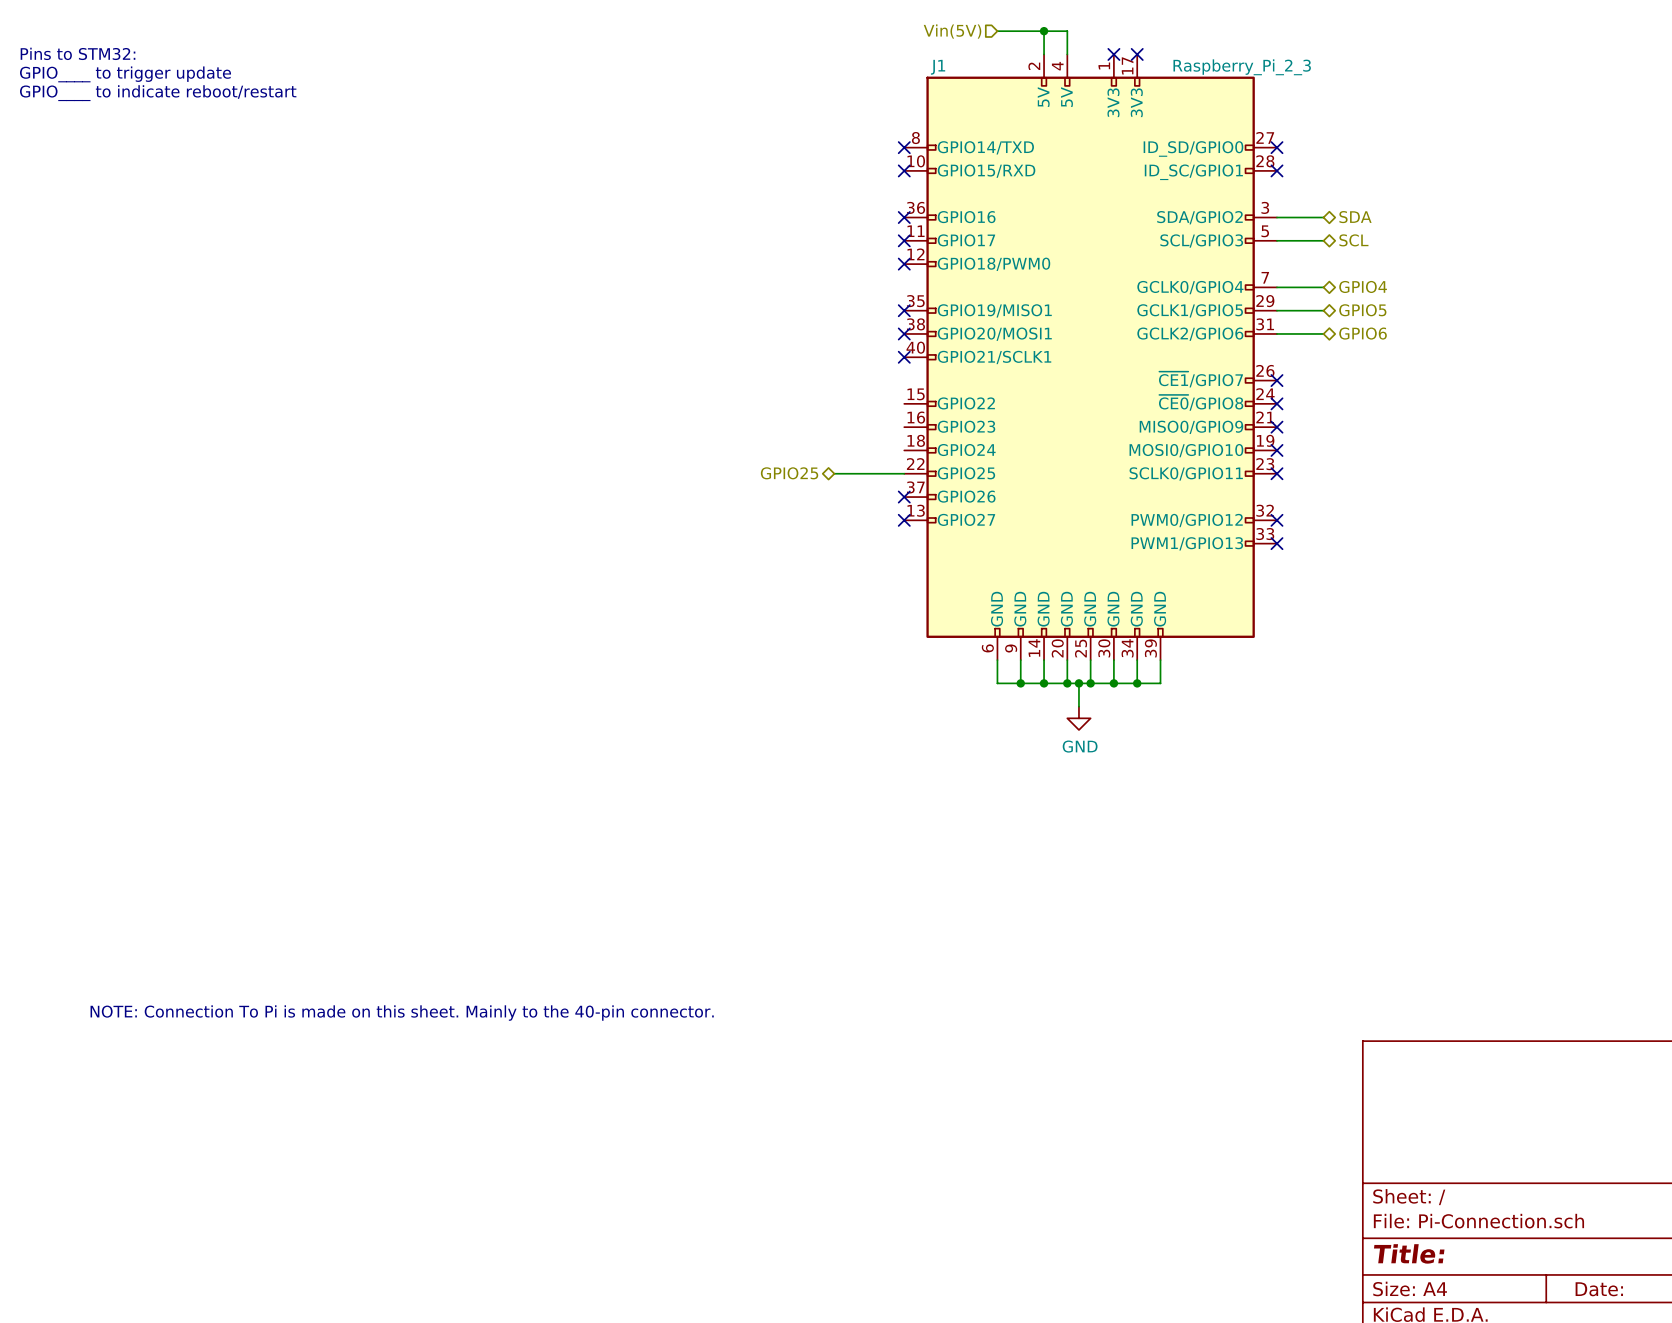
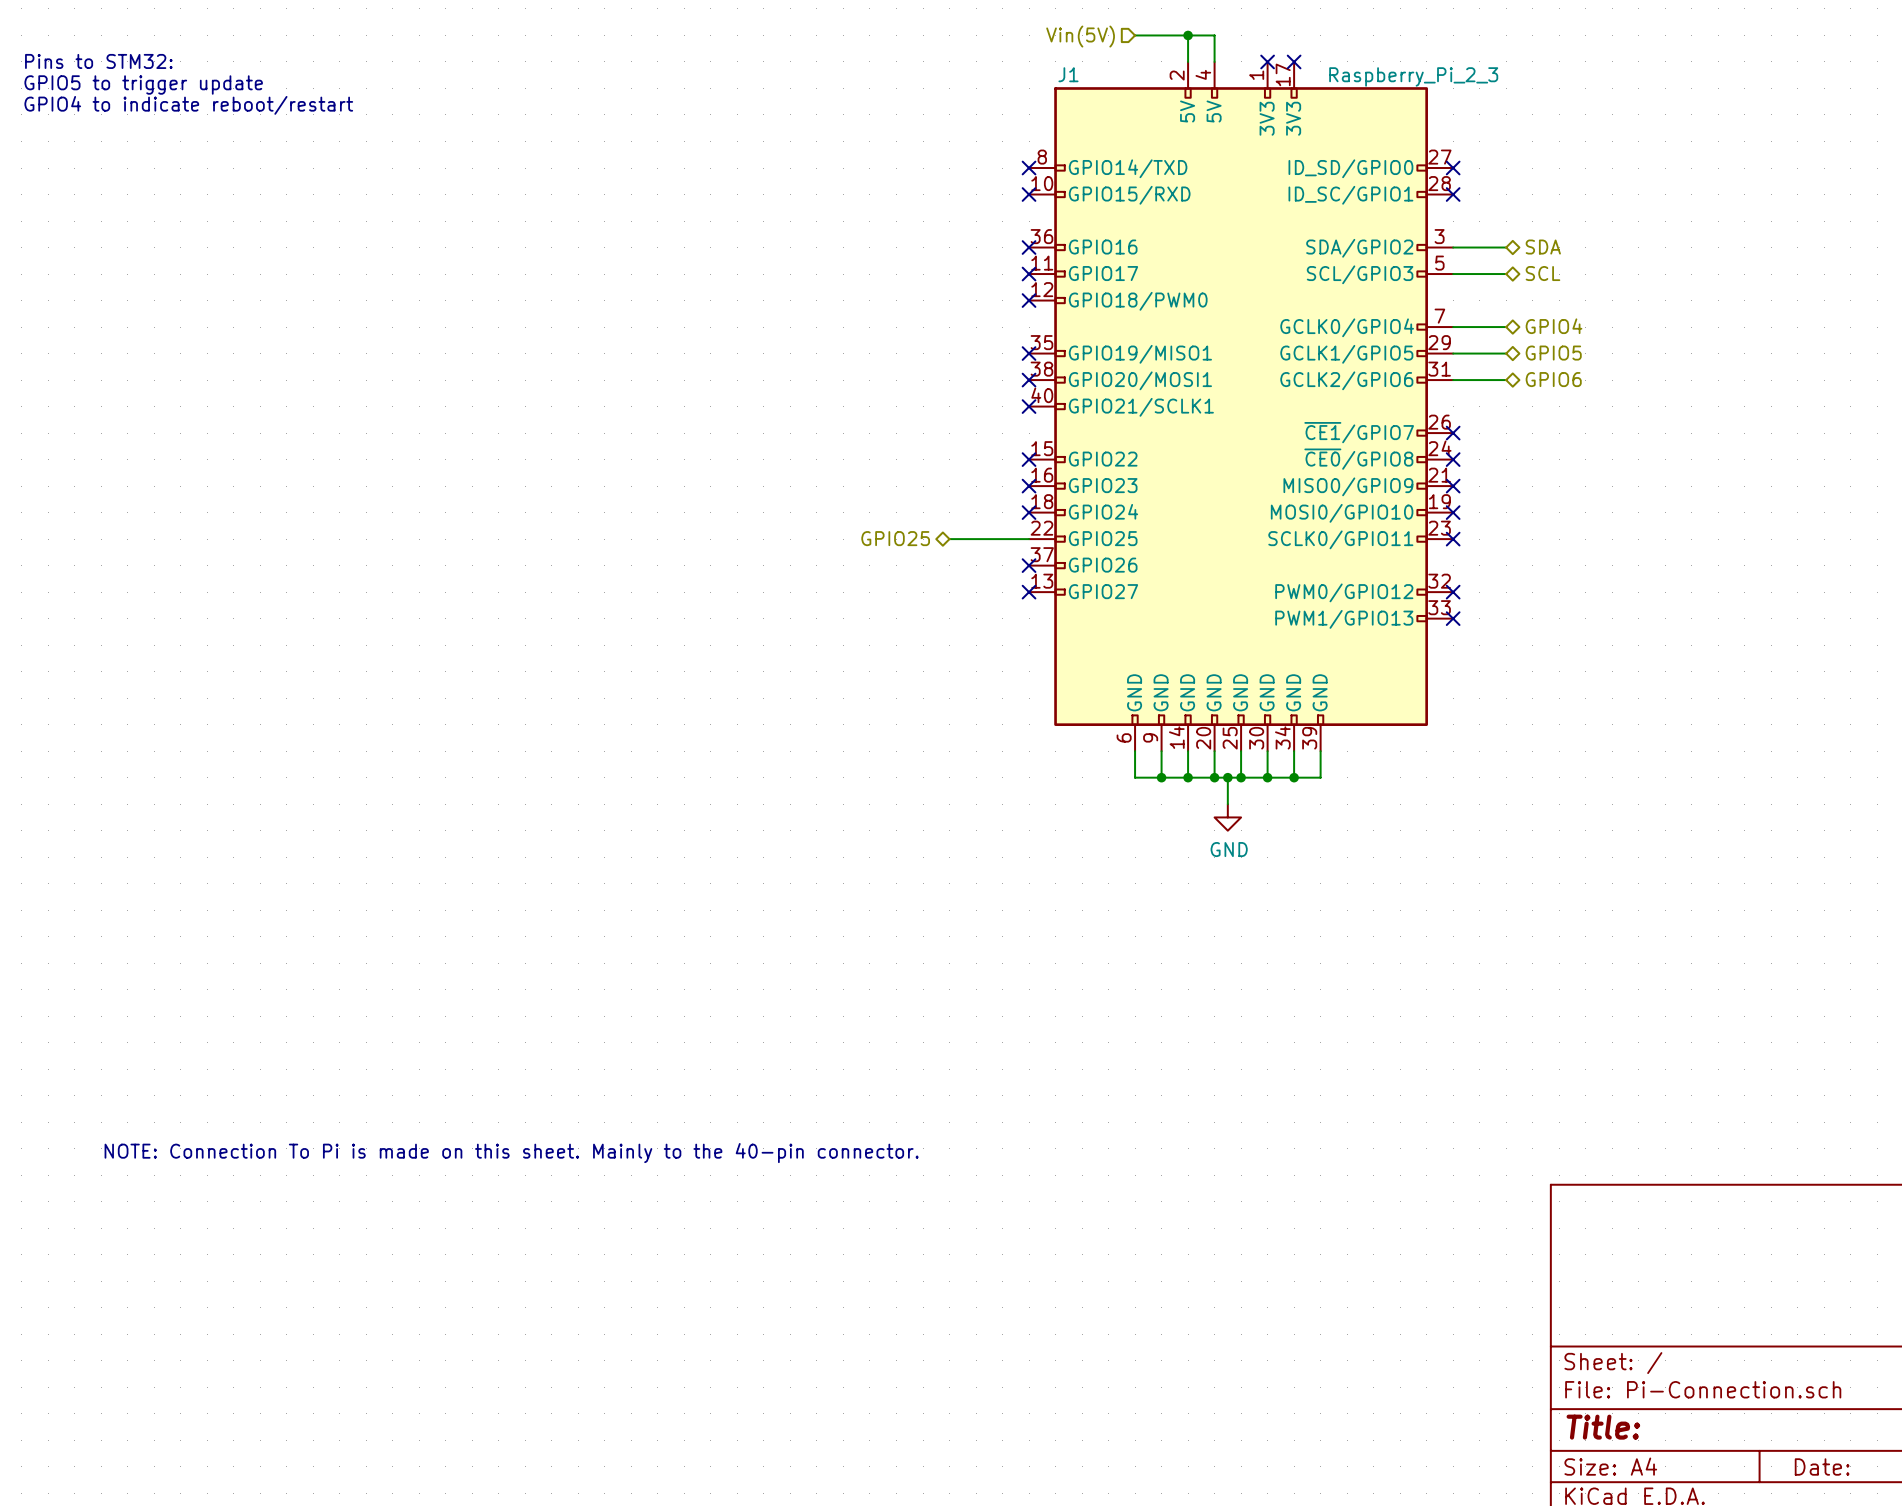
text: GPIO____ to trigger update (125, 74) -> GPIO5 to trigger update (143, 85)
text: GPIO____ to indicate reboot/restart (158, 93) -> GPIO4 to indicate reboot/restart (188, 105)
no-connect mark: none -> (1029, 459)
no-connect mark: none -> (1029, 486)
no-connect mark: none -> (1029, 512)

